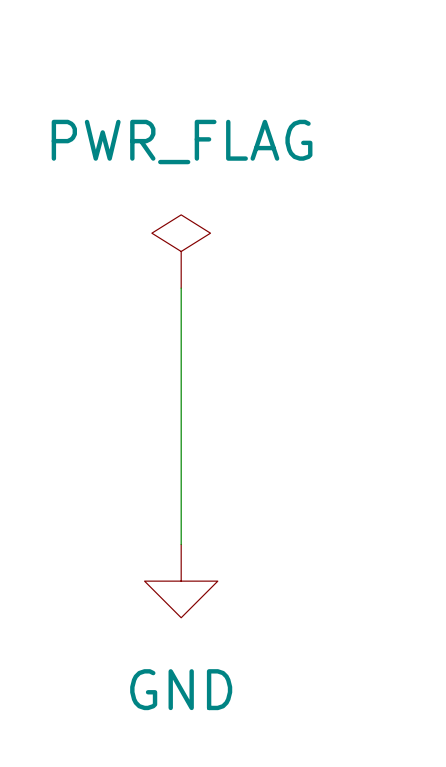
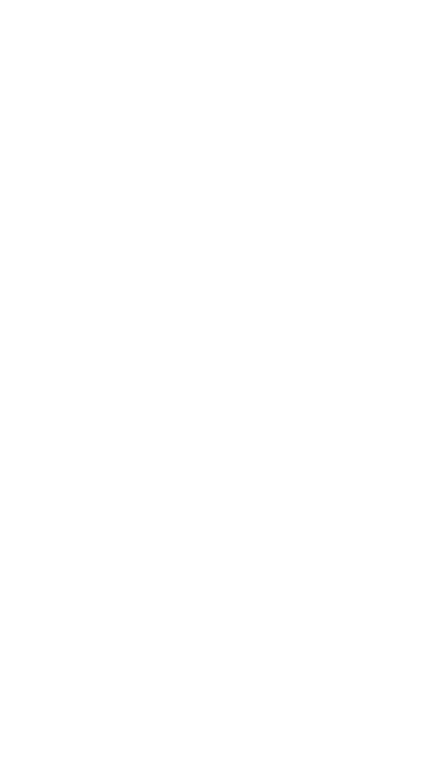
power symbol: PWR_FLAG (181, 251) -> none
wire: (181, 288) (181, 544) -> none
power symbol: GND (181, 581) -> none

